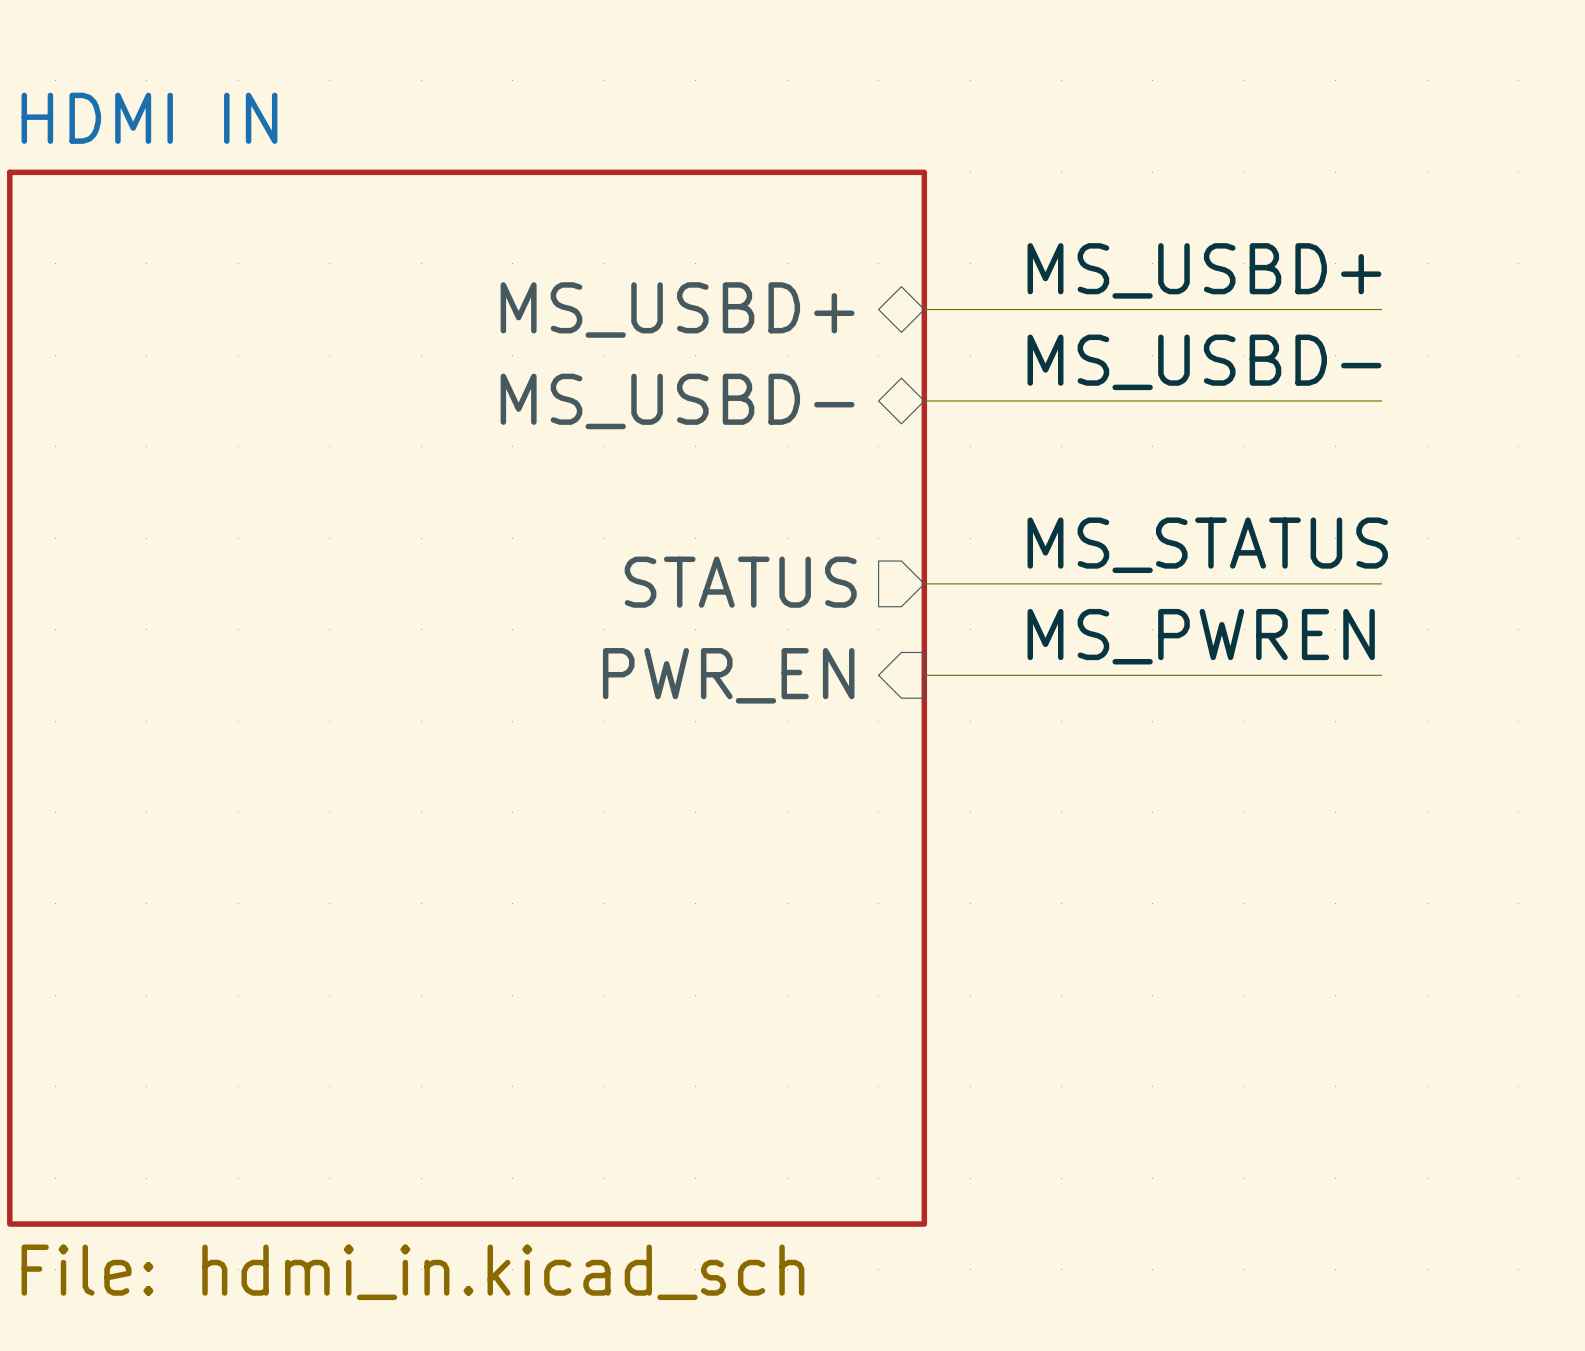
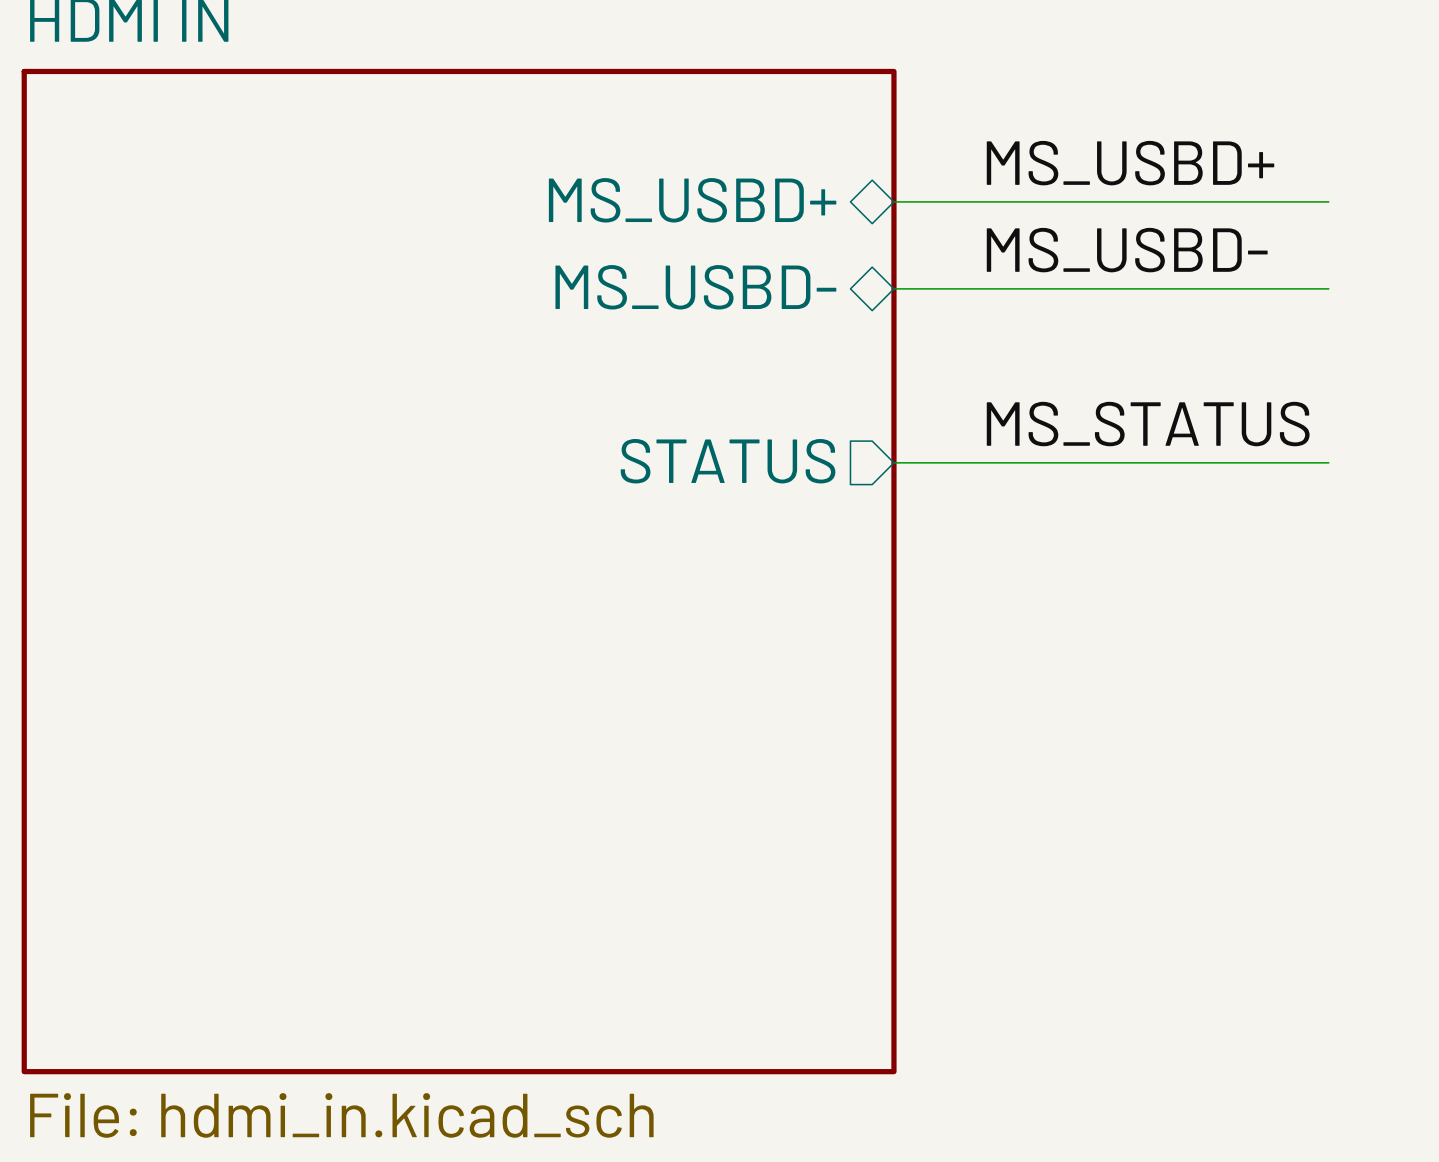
label: MS_PWREN (1201, 636) -> none
sheet pin: PWR_EN (728, 675) -> none
wire: (924, 675) (1381, 675) -> none

